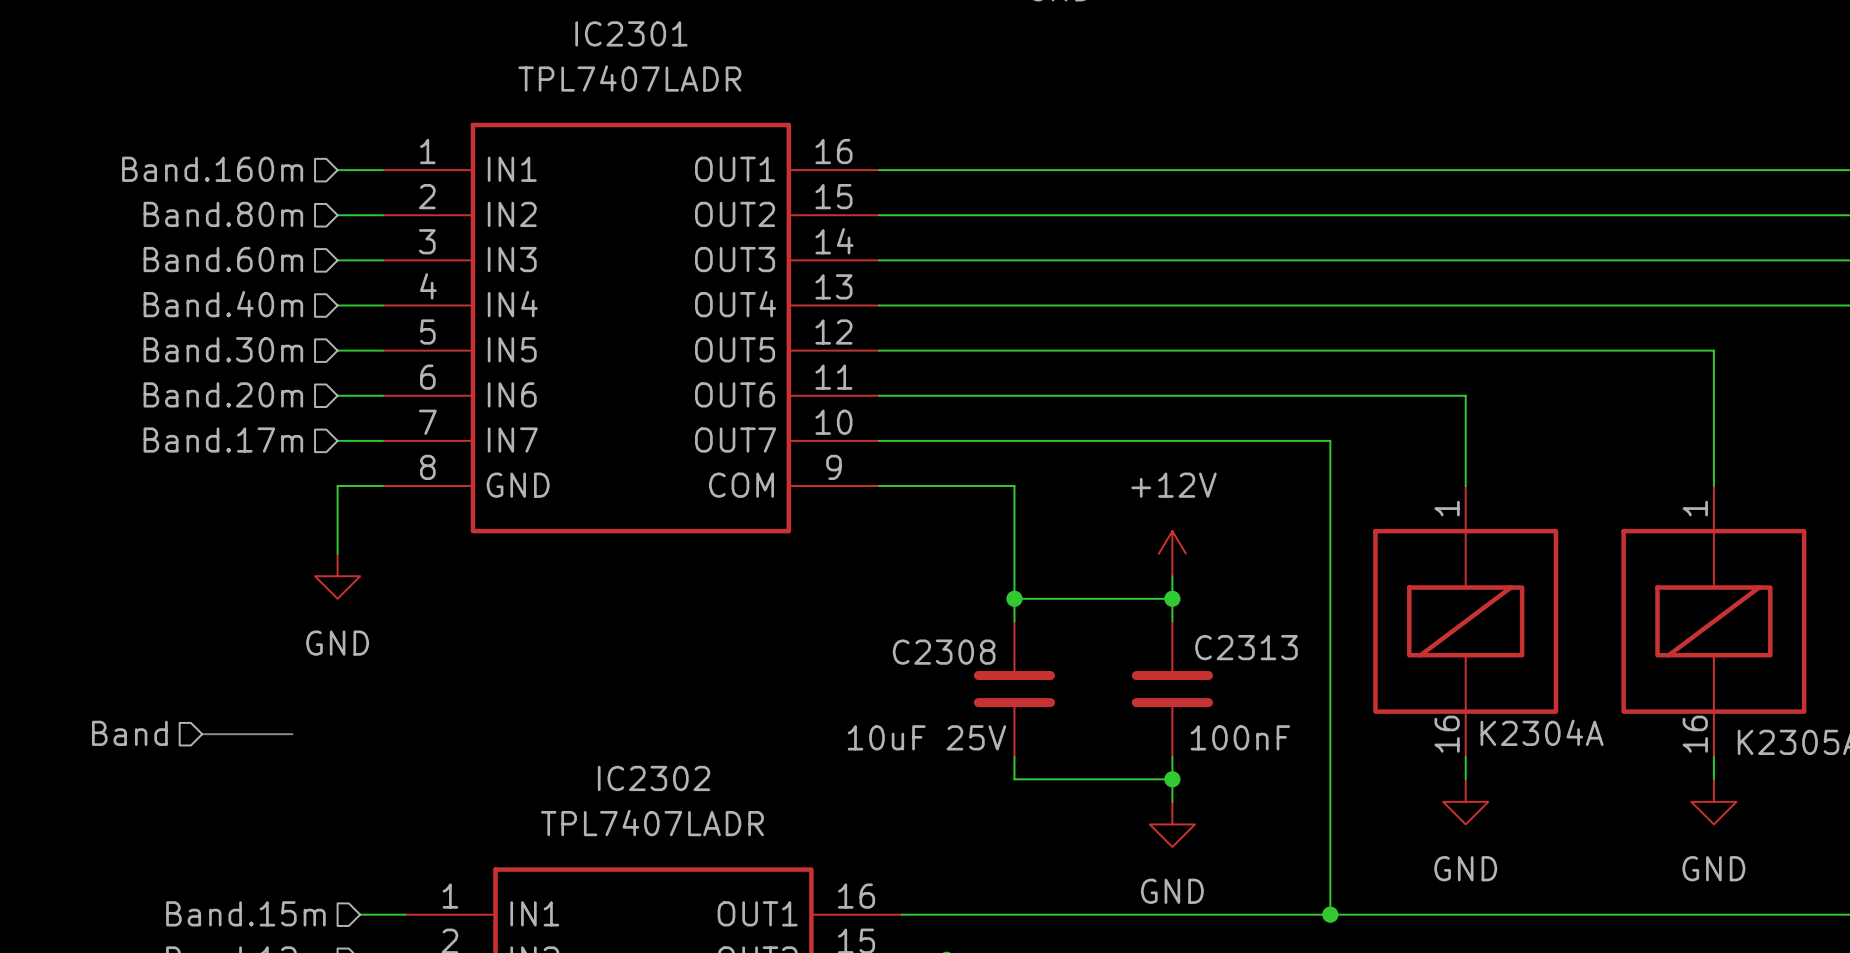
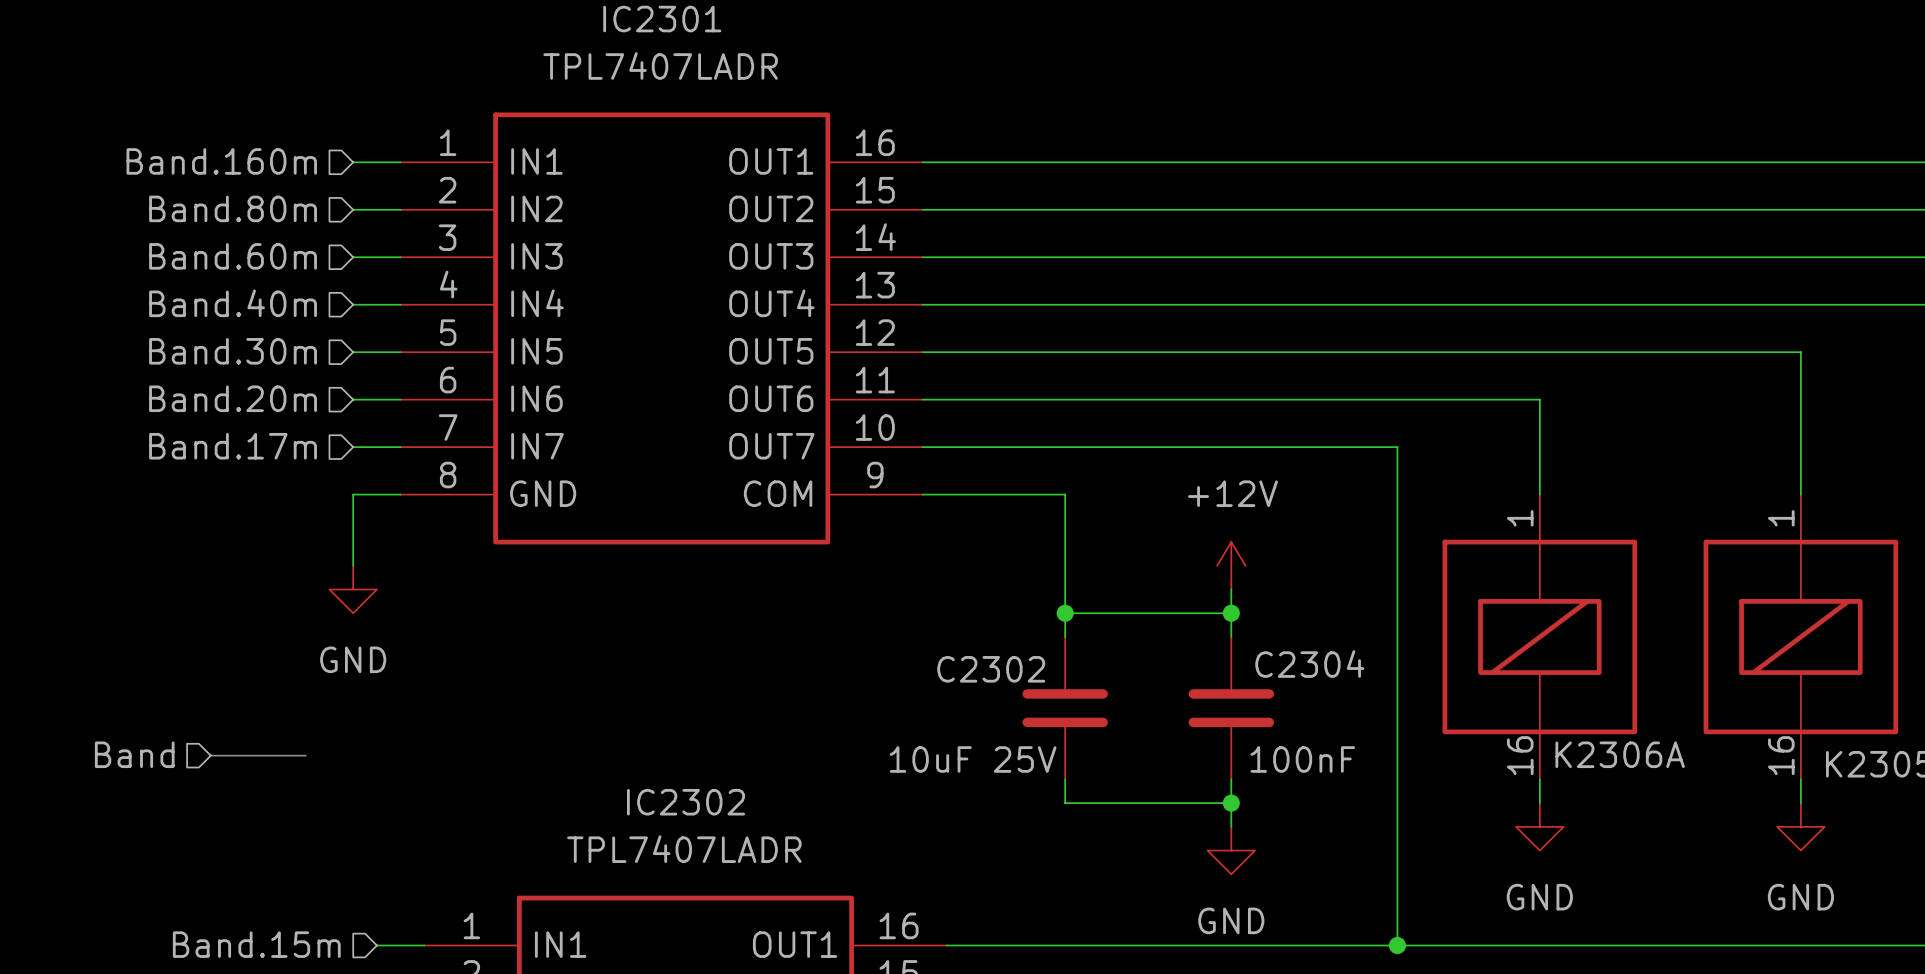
C2313 name: C2313 (1246, 647) -> C2304 (1309, 664)
C2308 name: C2308 (944, 652) -> C2302 (991, 669)
K2304A name: K2304A (1542, 732) -> K2306A (1620, 754)

